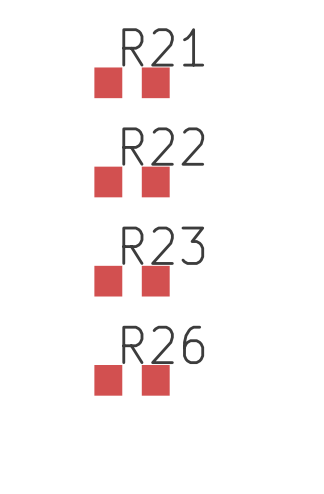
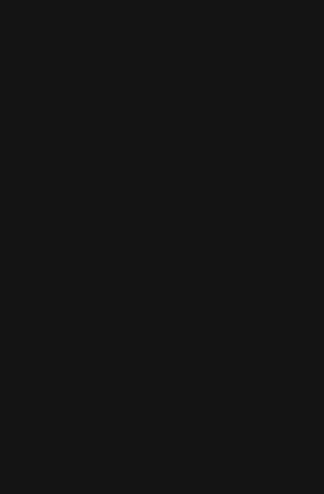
R21: (132, 82) -> none
R22: (132, 181) -> none
R23: (132, 281) -> none
R26: (132, 380) -> none

